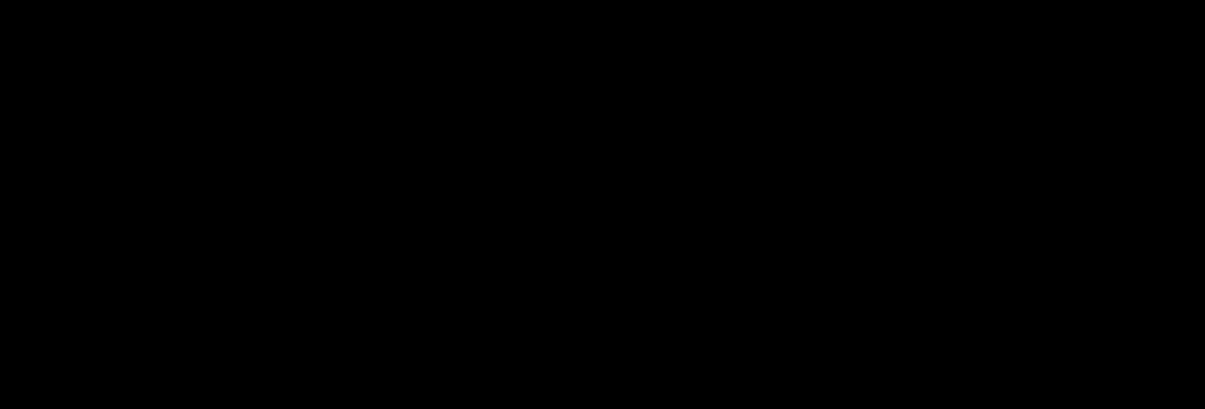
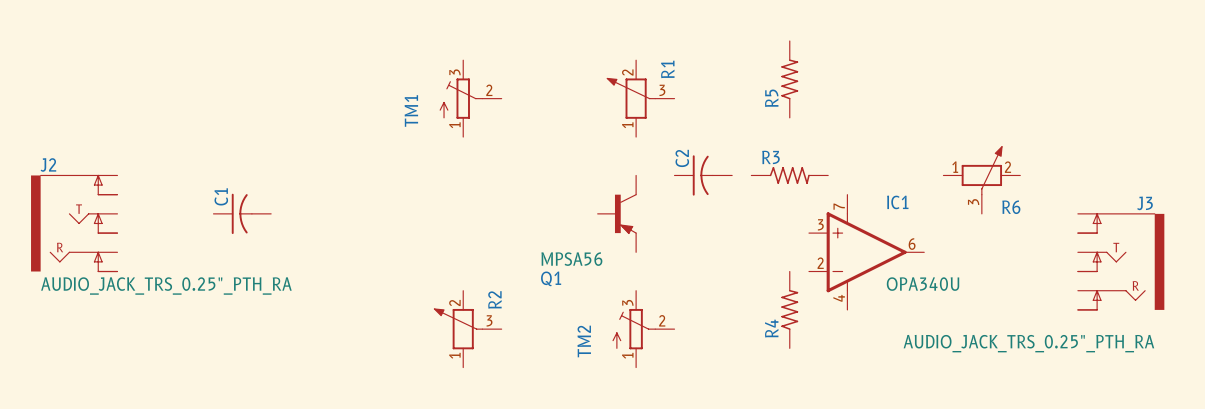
R5: none -> (789, 79)
TM1: none -> (470, 98)
R1: none -> (640, 98)
C2: none -> (703, 175)
R3: none -> (789, 175)
R6: none -> (981, 179)
C1: none -> (242, 213)
Q1: none -> MPSA56 (617, 213)
J2: none -> AUDIO_JACK_TRS_0.25"_PTH_RA (74, 223)
IC1: none -> OPA340U (866, 252)
J3: none -> AUDIO_JACK_TRS_0.25"_PTH_RA (1120, 261)
R4: none -> (789, 309)
R2: none -> (467, 329)
TM2: none -> (643, 329)

